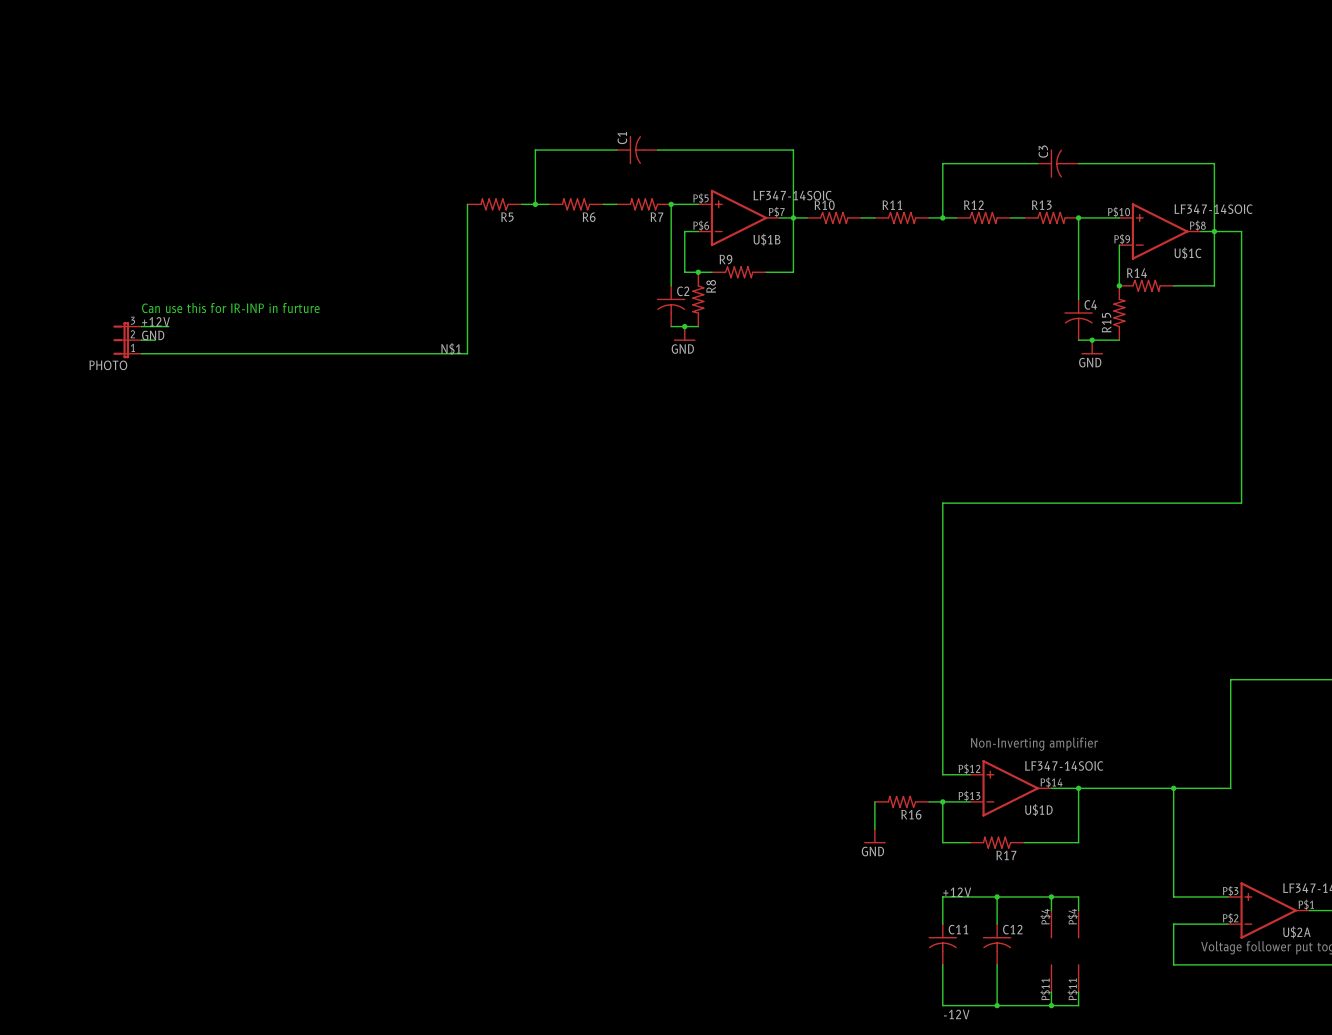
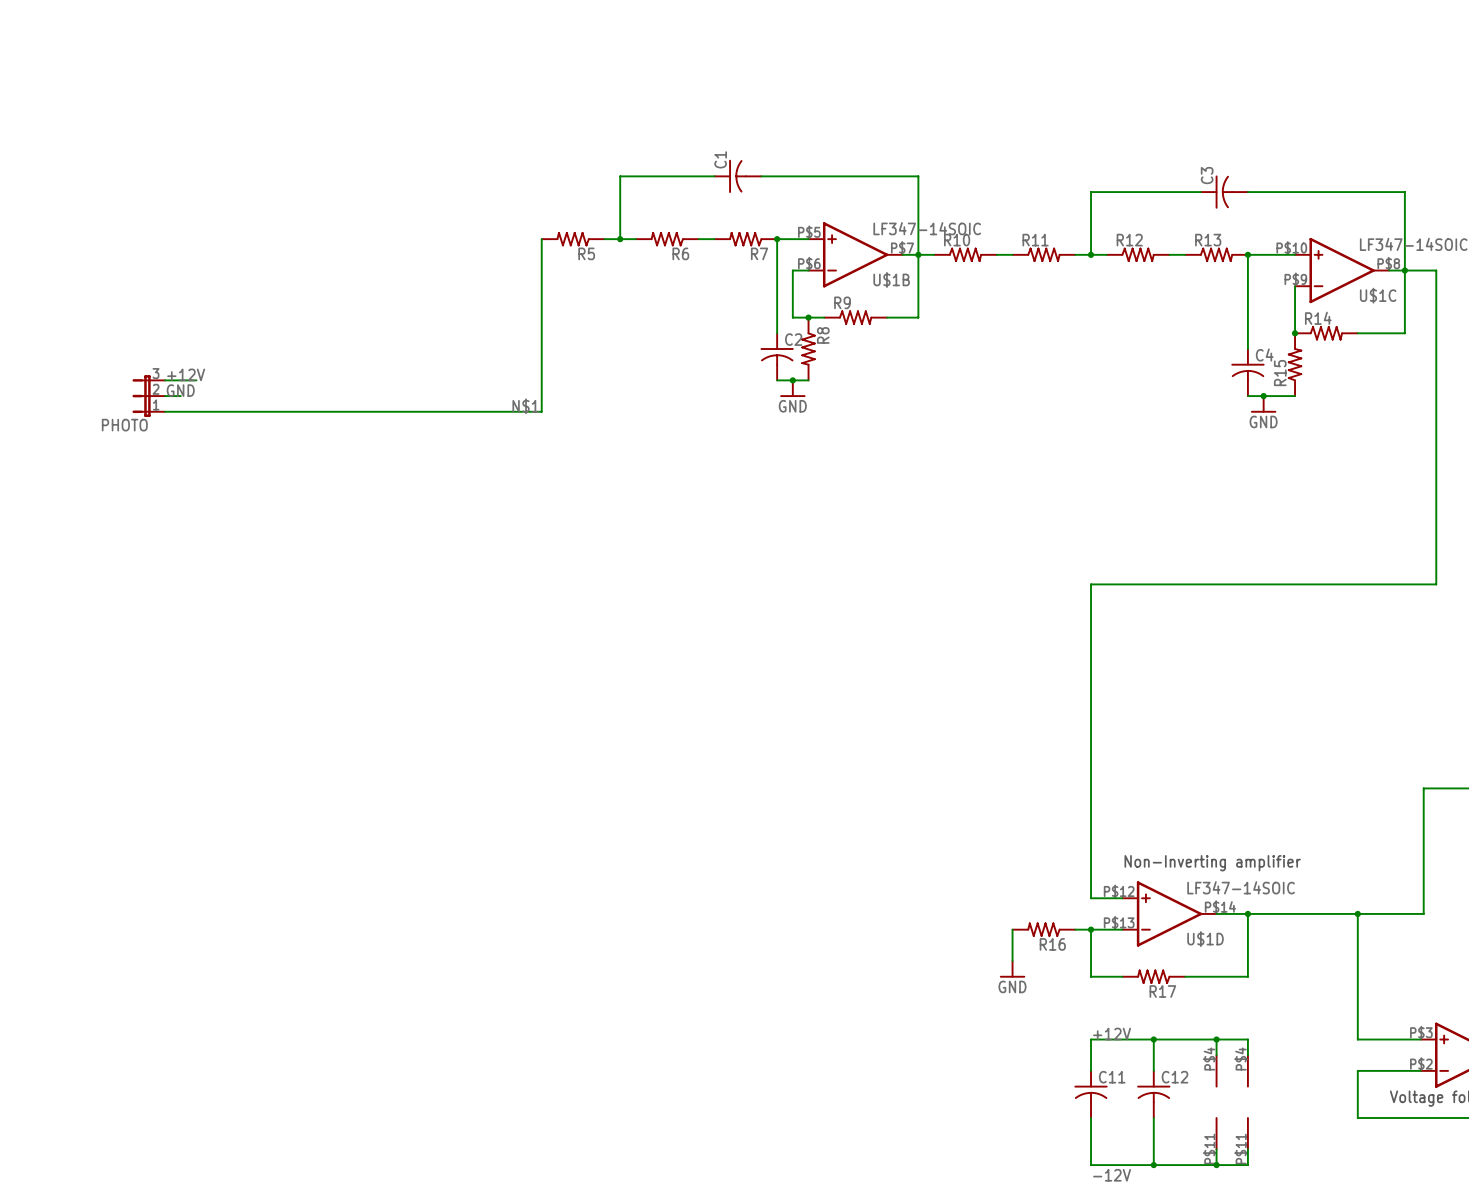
text: Can use this for IR-INP in furture (230, 308) -> none

